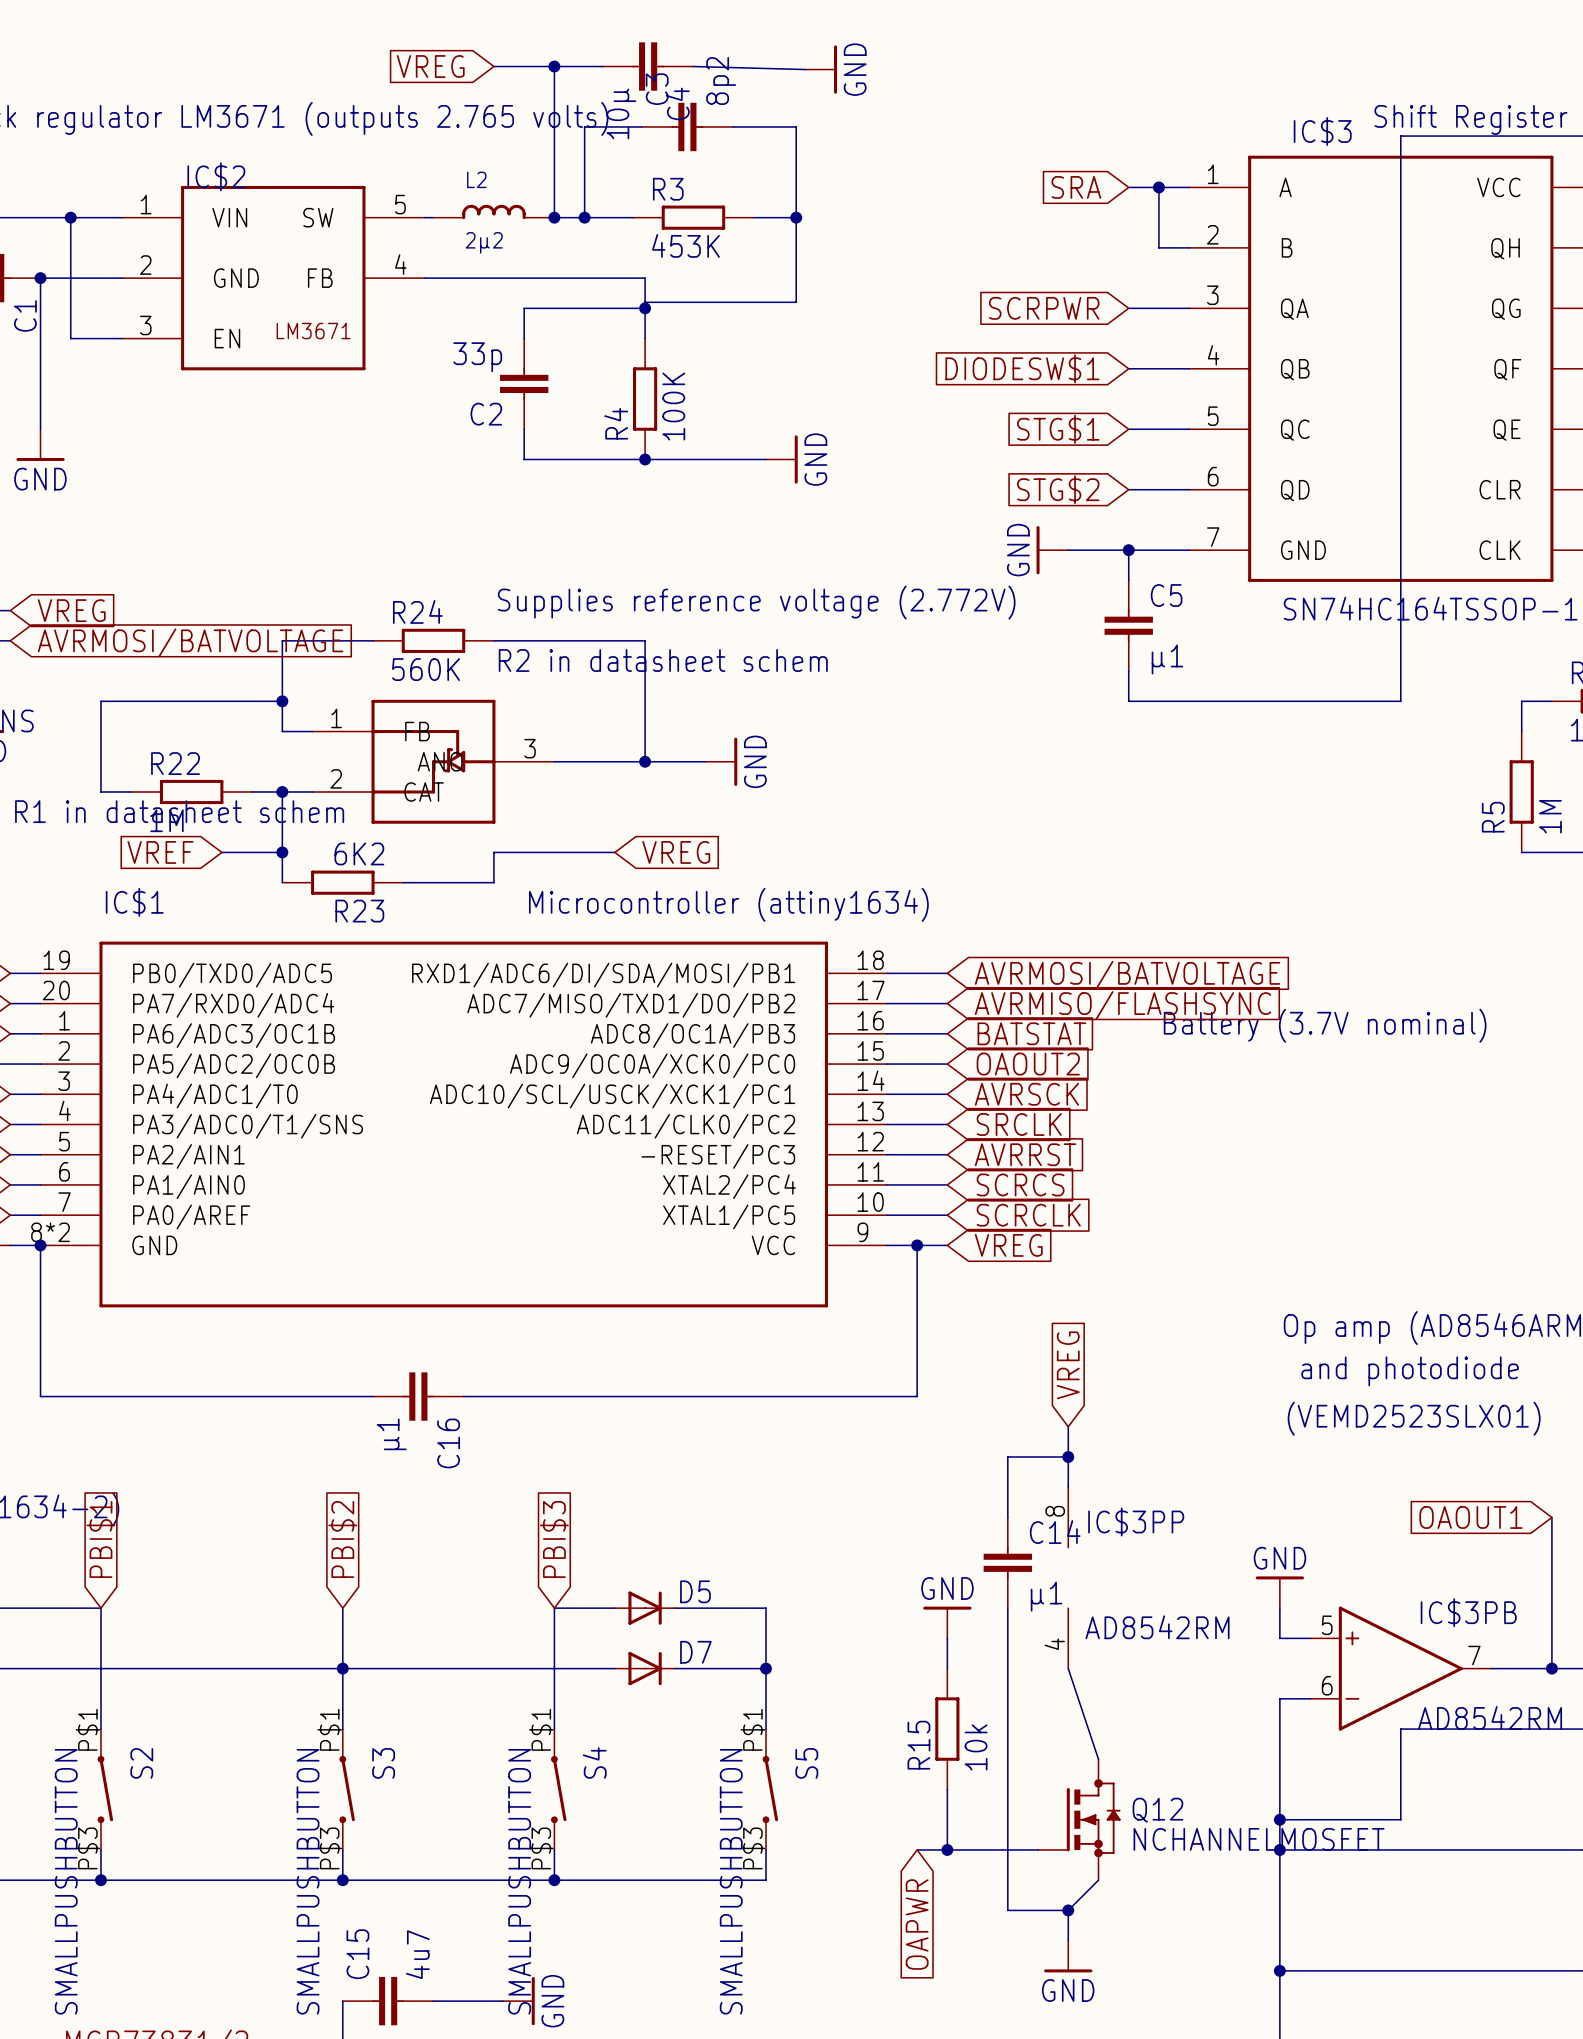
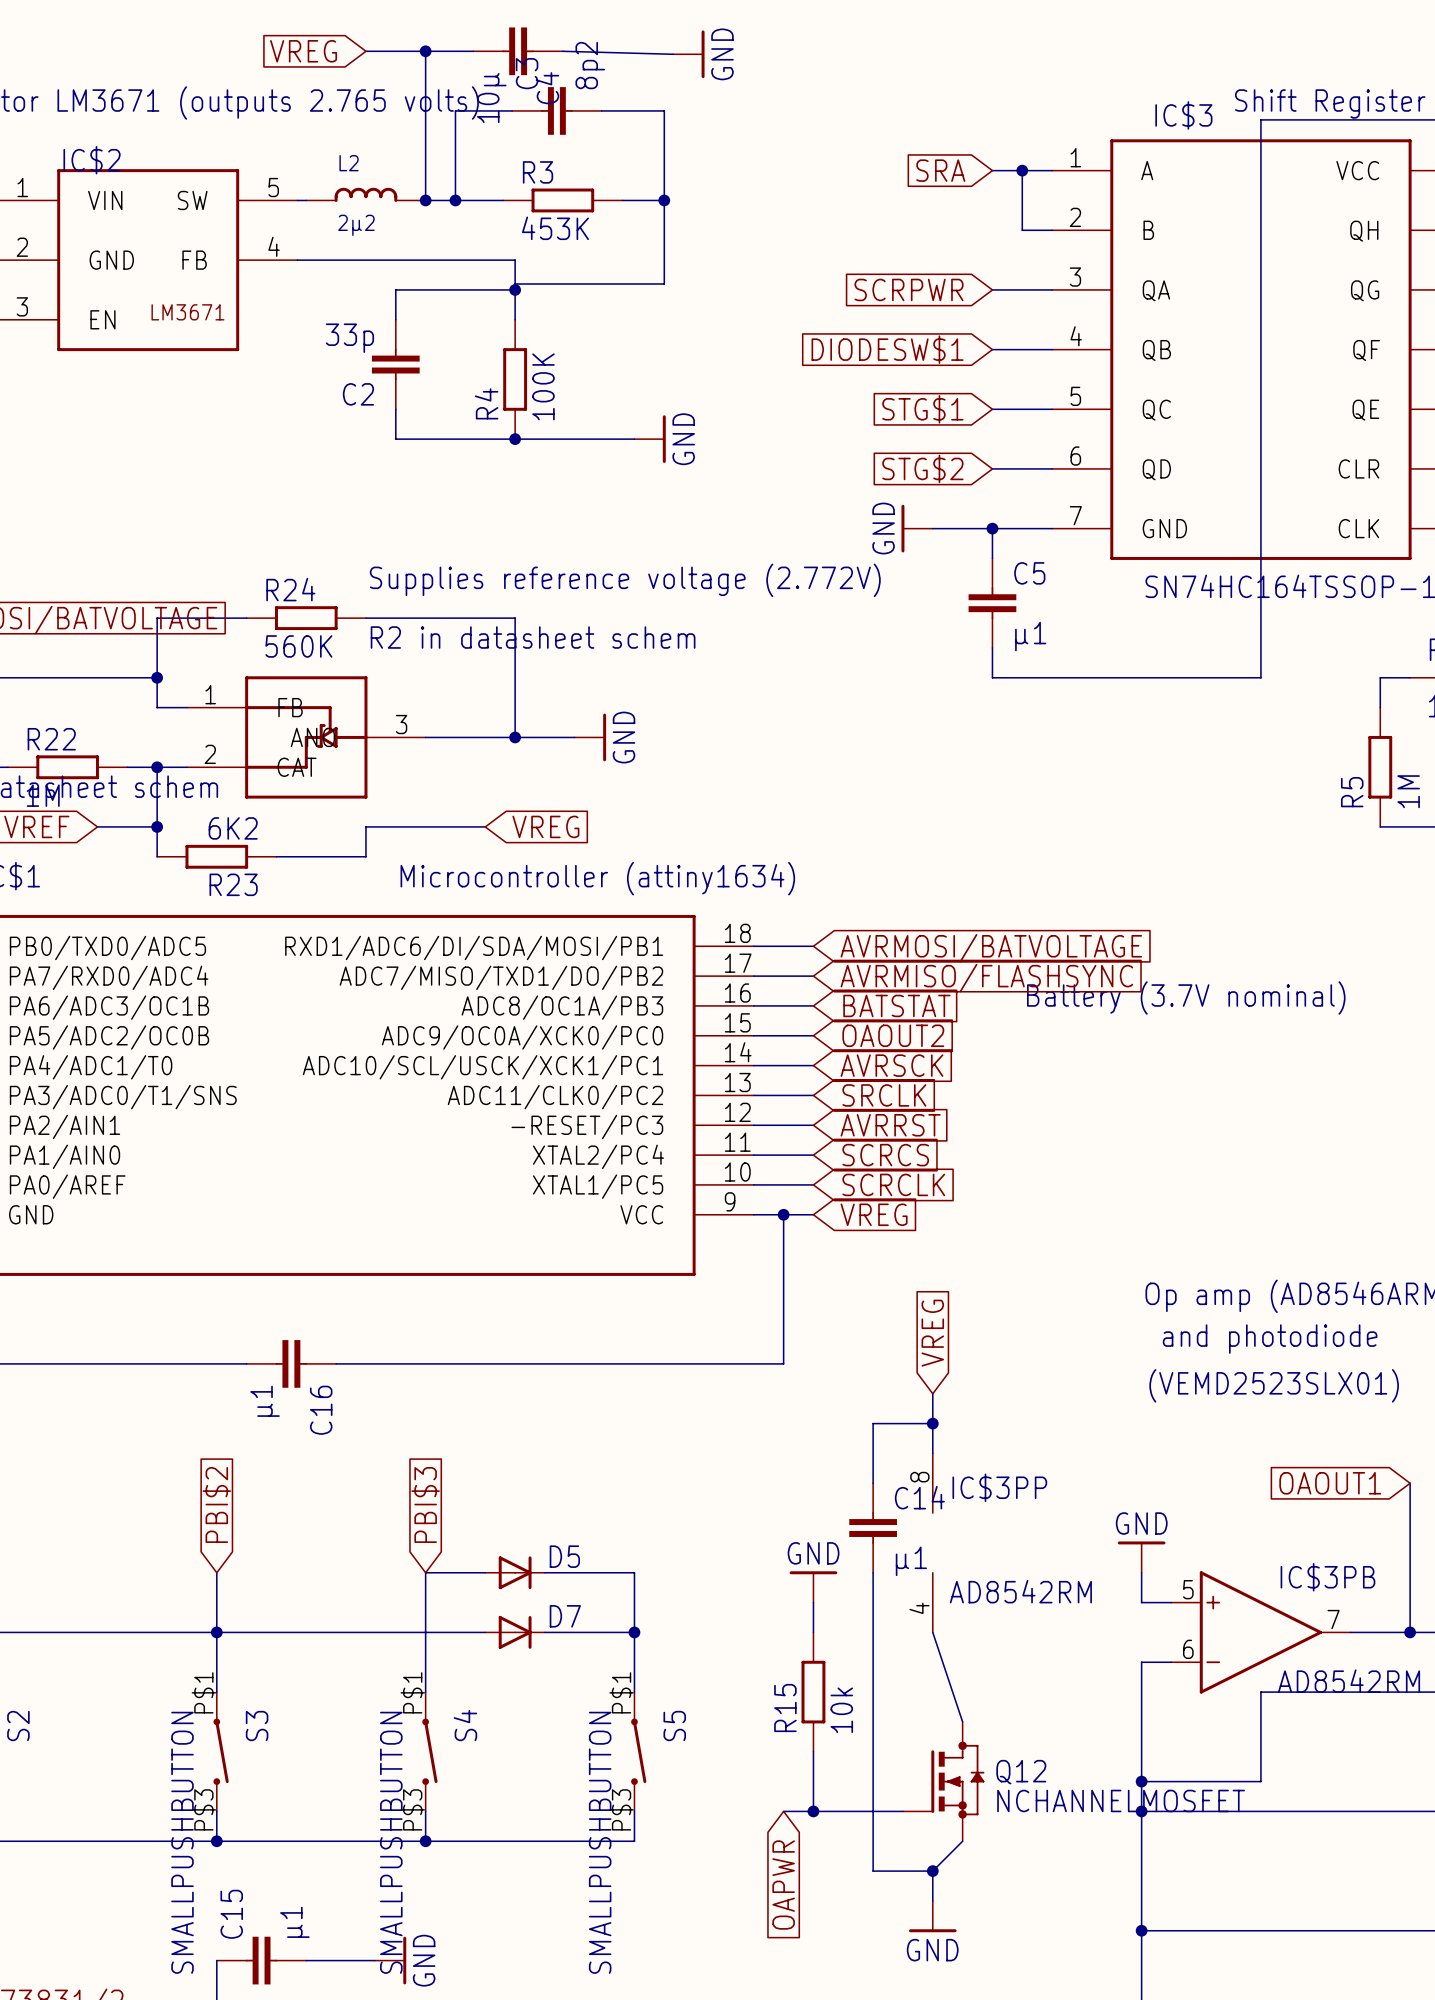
C15 value: 4u7 (417, 1954) -> µ1 (294, 1922)

